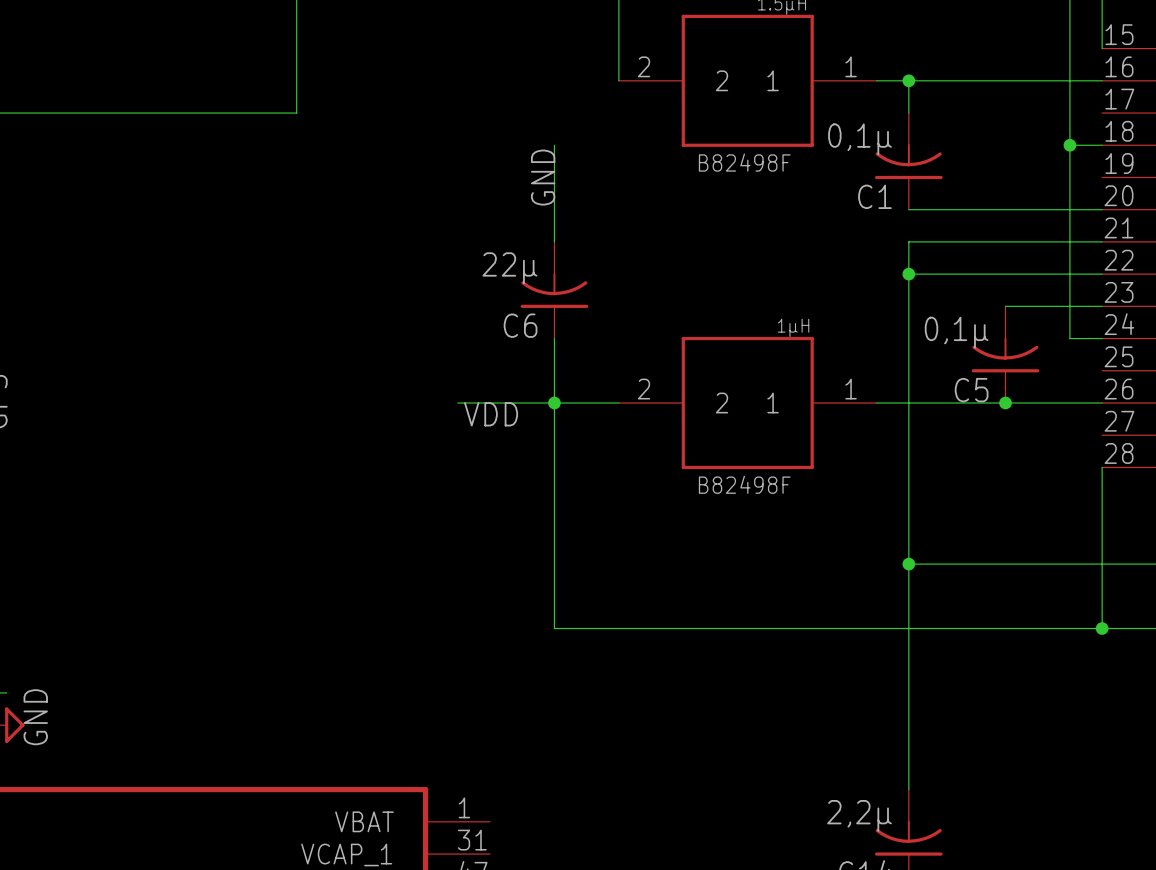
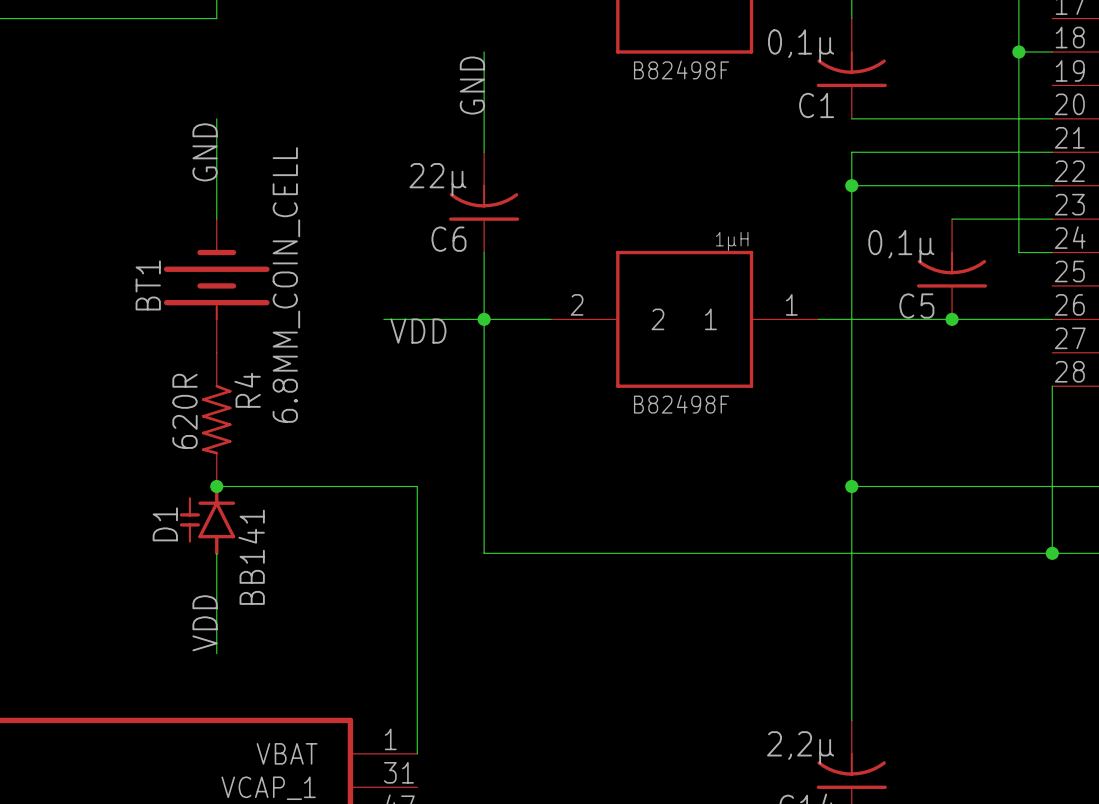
wire: none -> (216, 118) (216, 219)
label: none -> GND (205, 152)
BT1: none -> 6.8MM_COIN_CELL (216, 285)
R4: none -> 620R (216, 419)
wire: none -> (216, 486) (417, 486) (417, 753)
junction: none -> (216, 486)
D1: none -> BB141 (207, 519)
wire: none -> (216, 553) (216, 653)
label: none -> VDD (205, 623)

